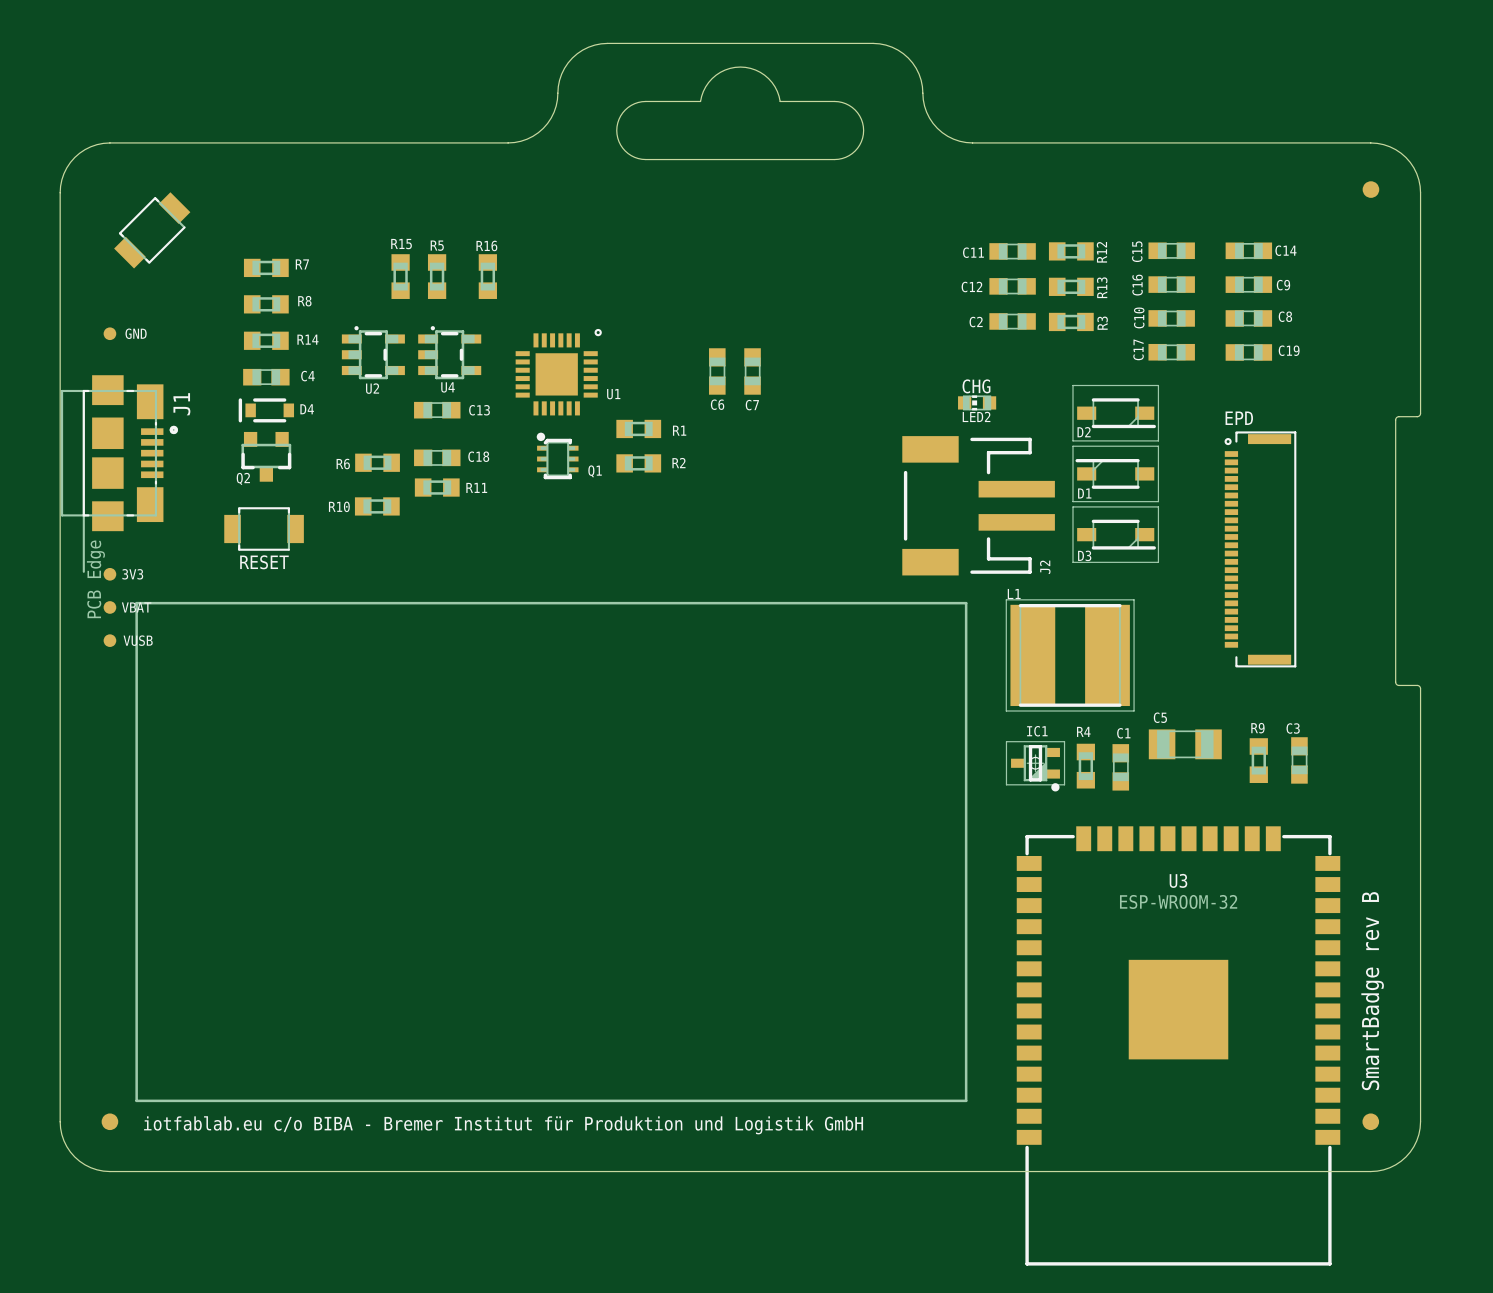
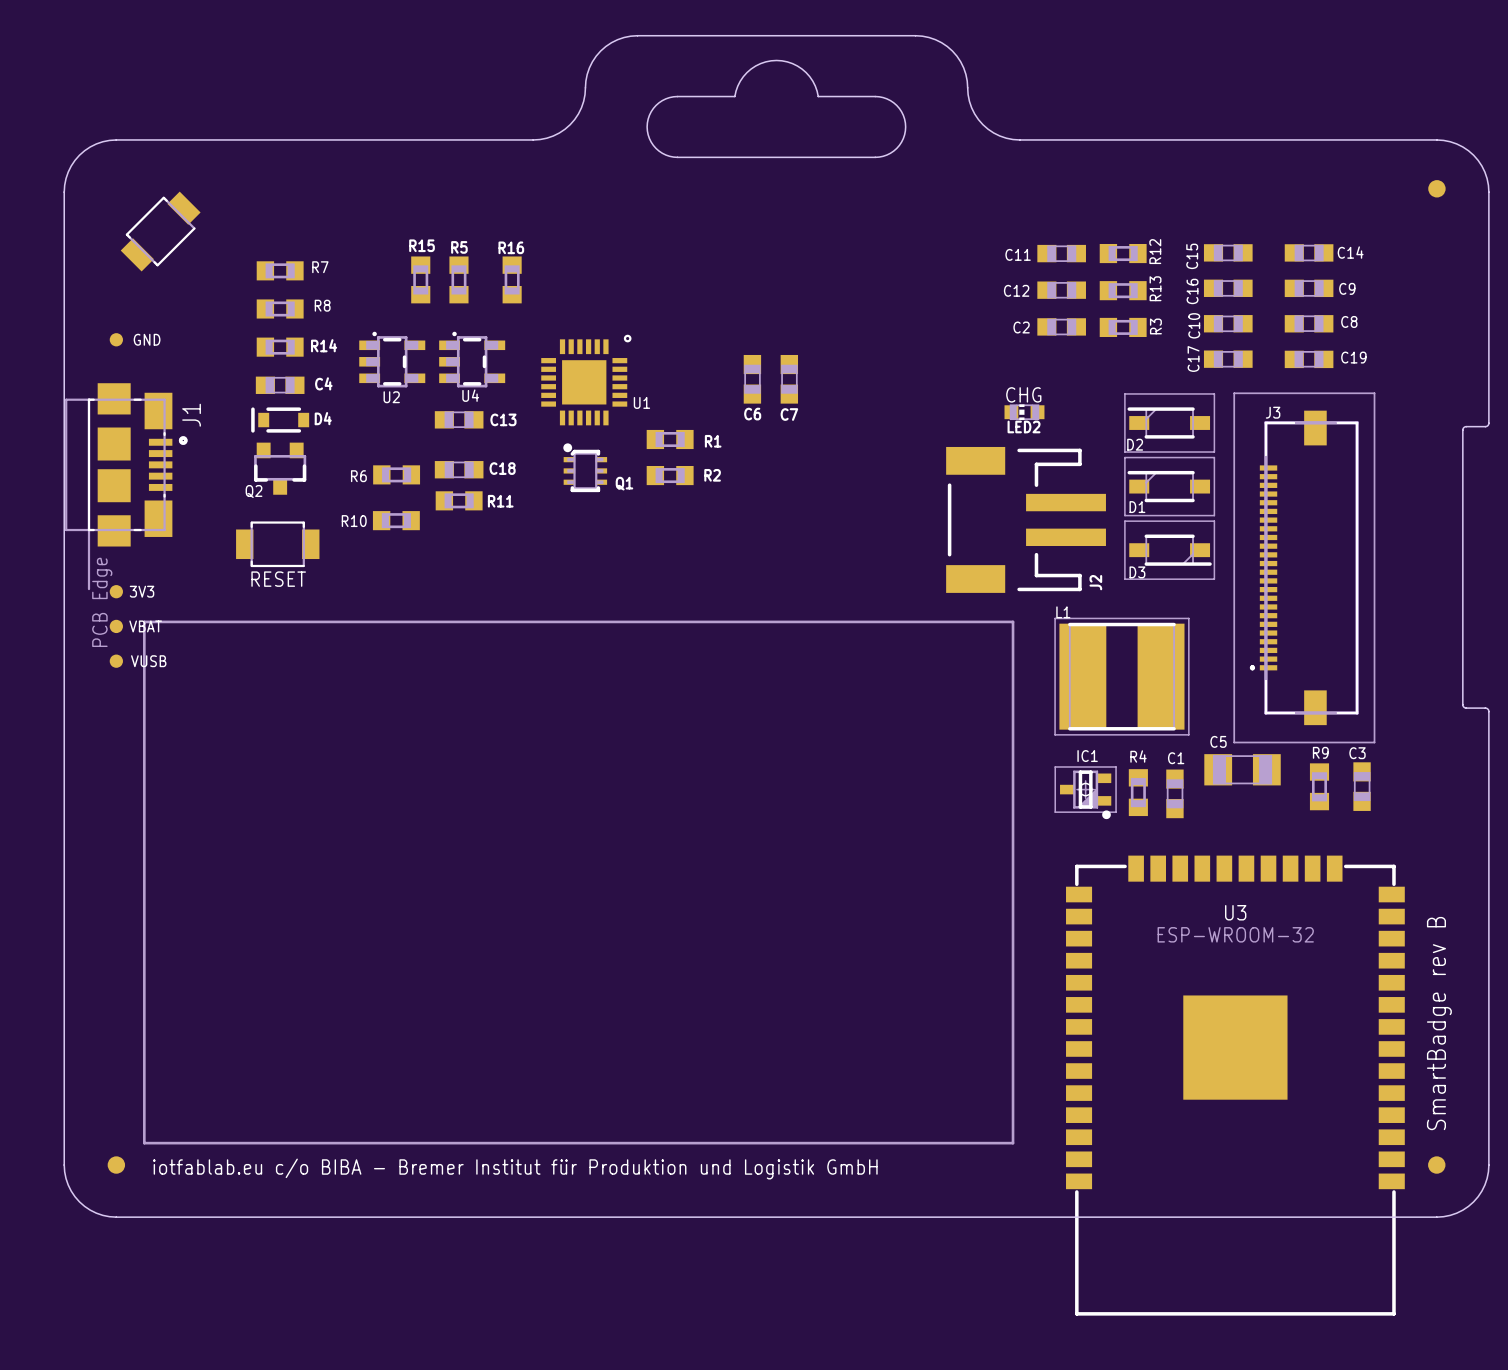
D2 rotation: 0° (1115, 413) -> 180° (1169, 422)
EPD: (1260, 549) -> none
J3: none -> (1304, 567)

